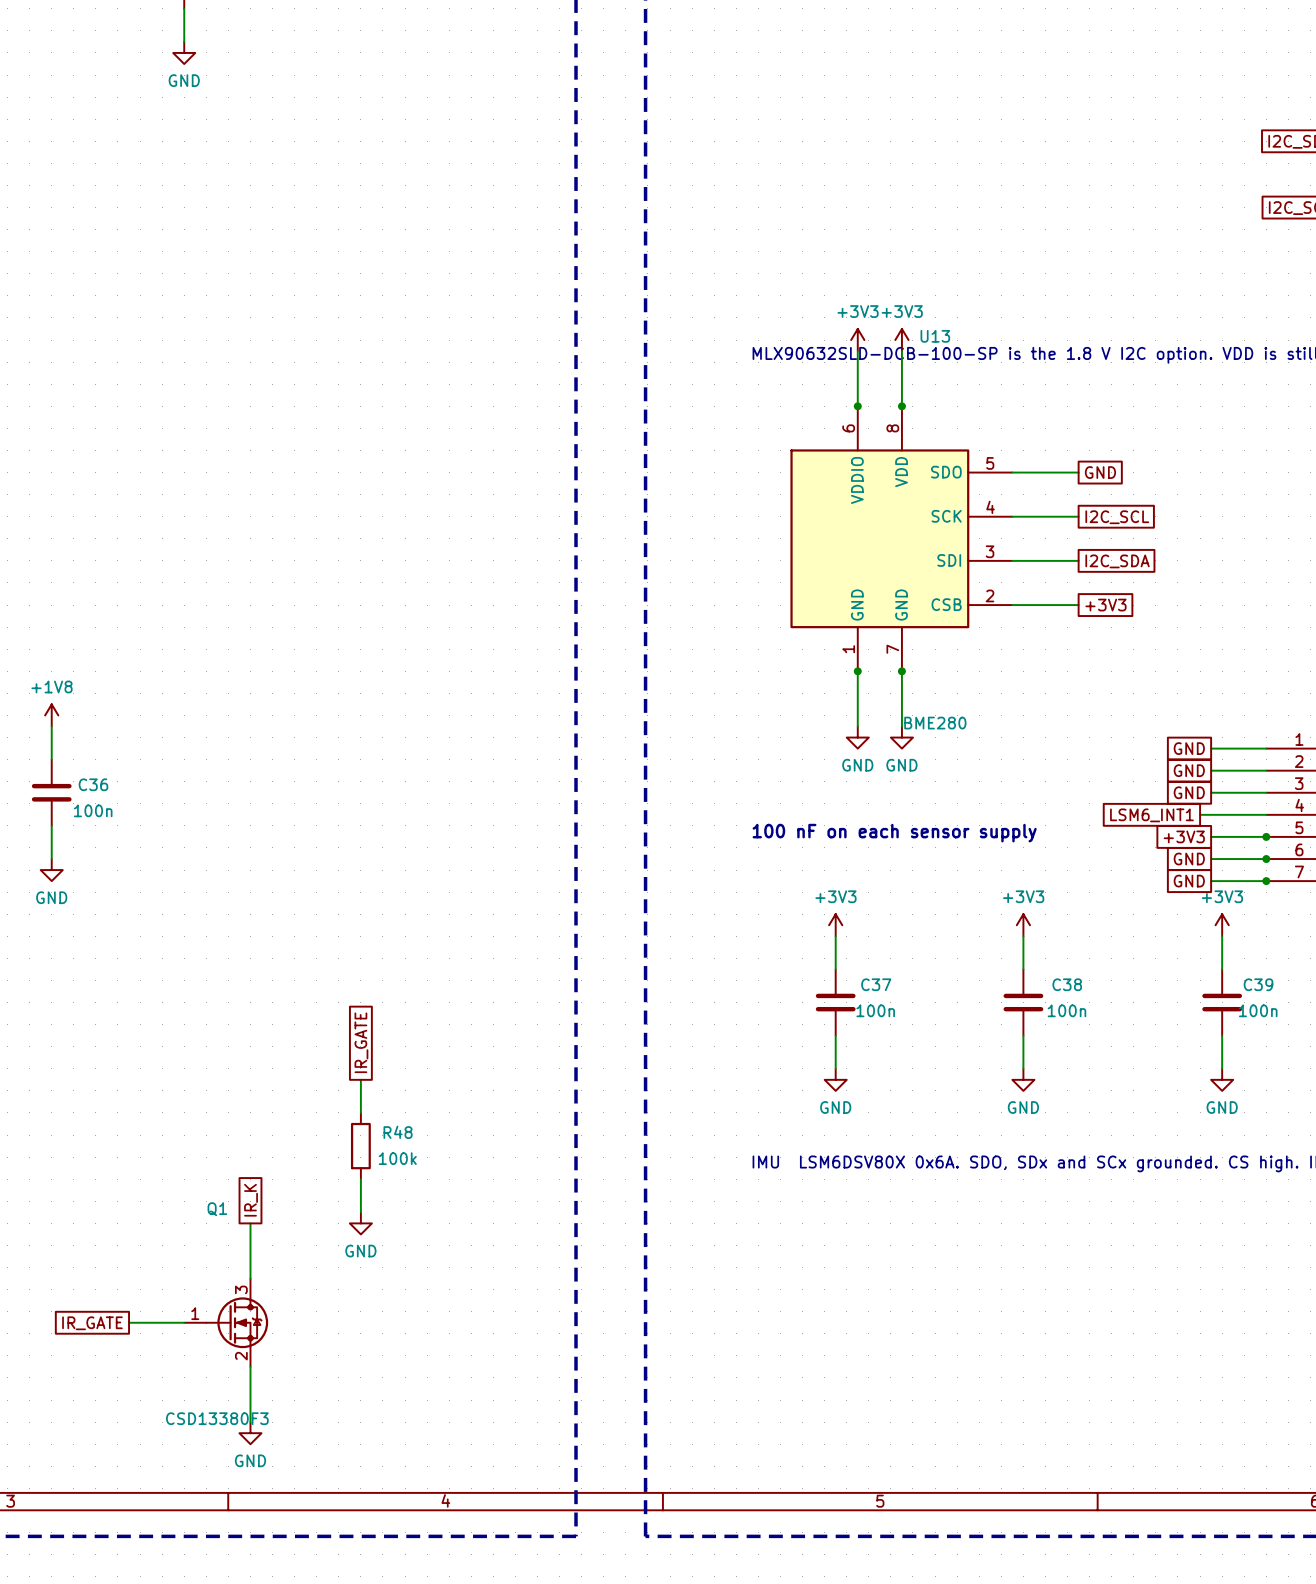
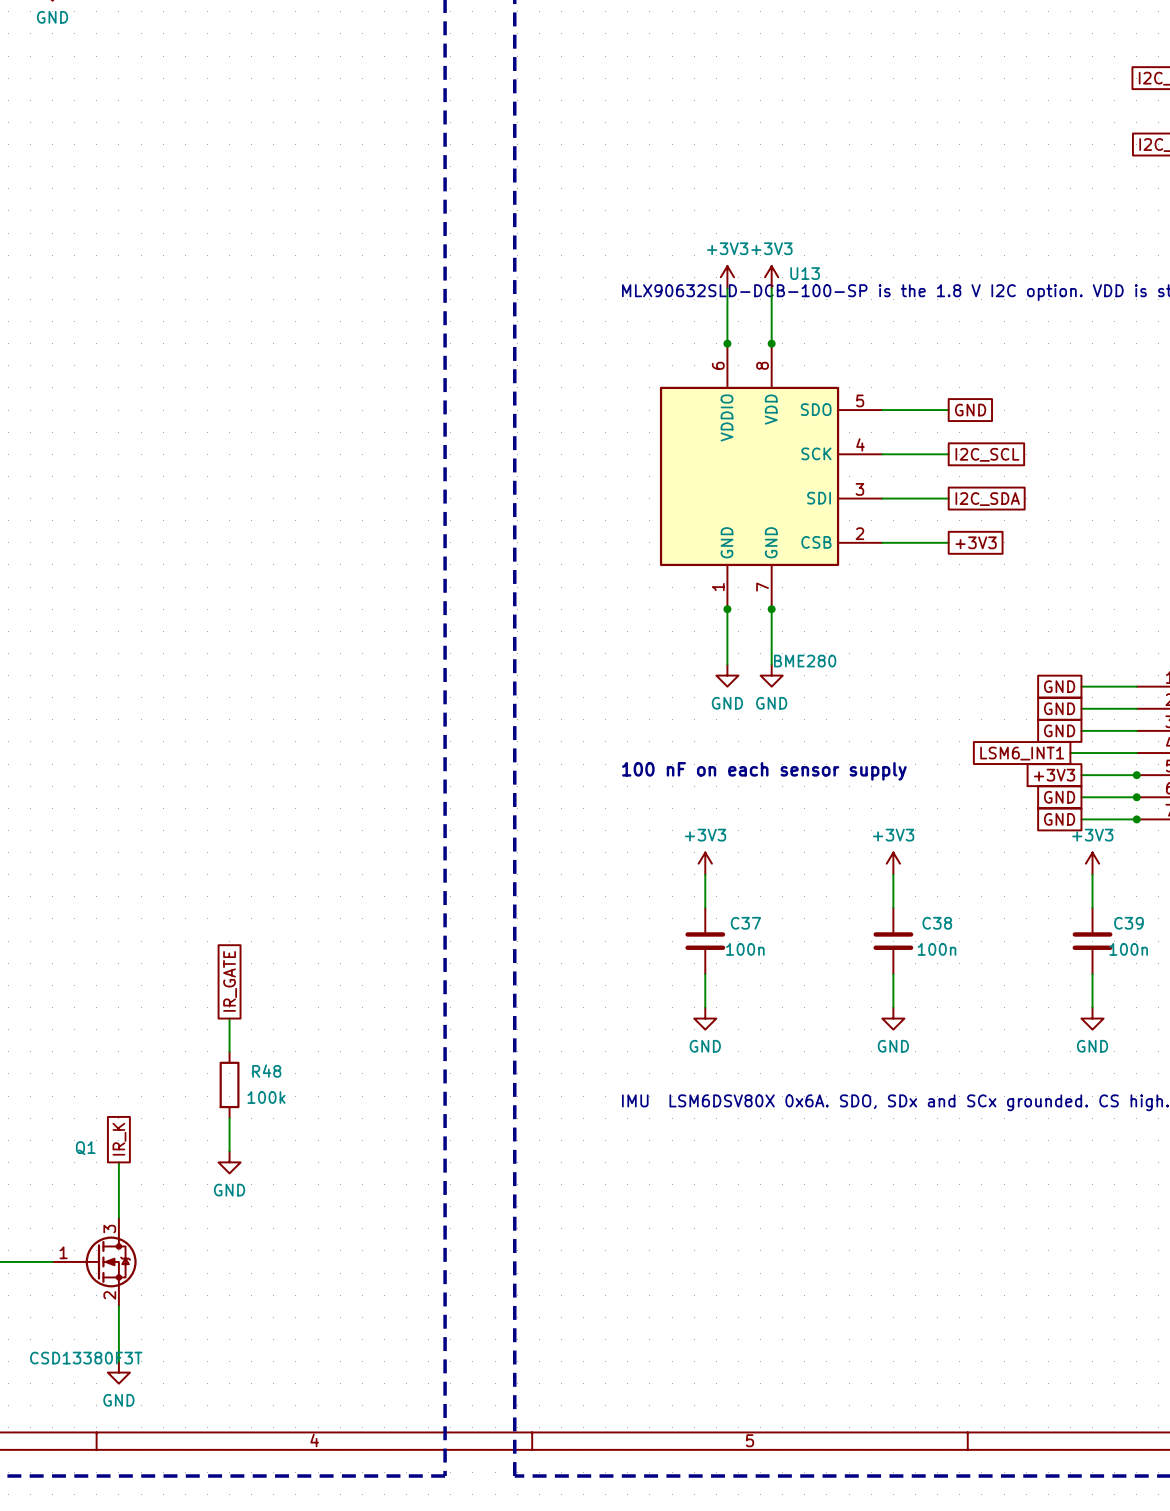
Q1 value: CSD13380F3 (217, 1418) -> CSD13380F3T (86, 1358)

